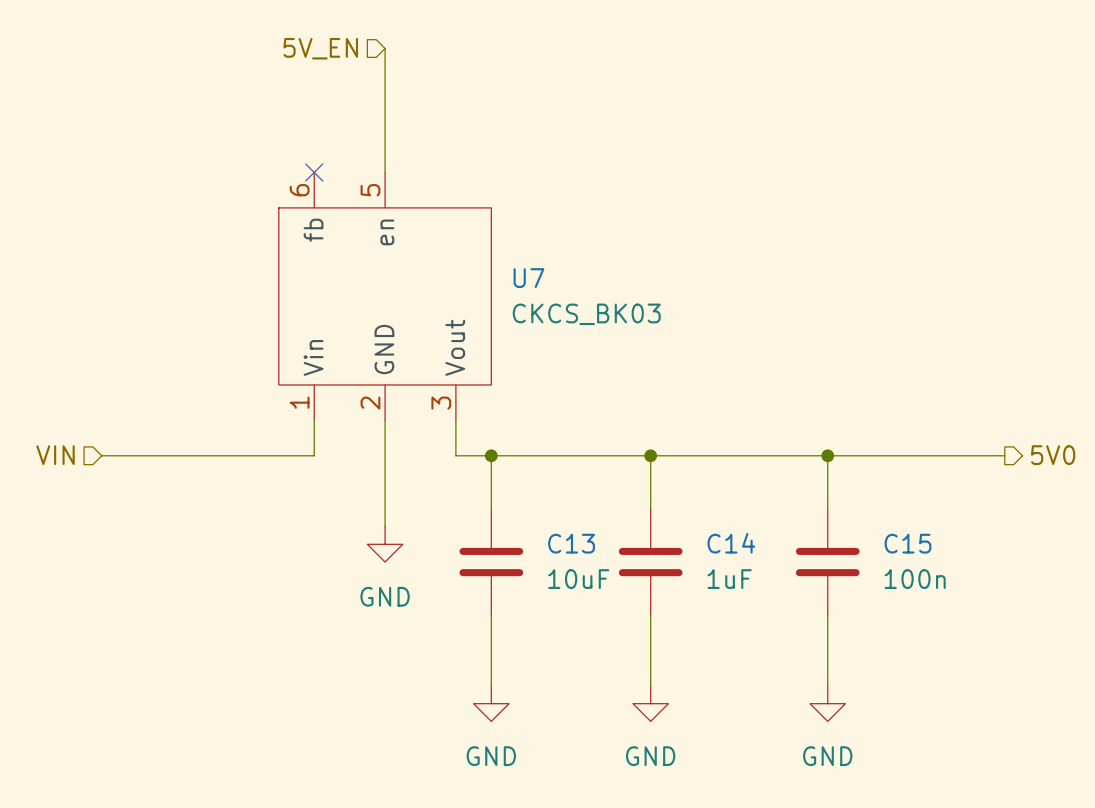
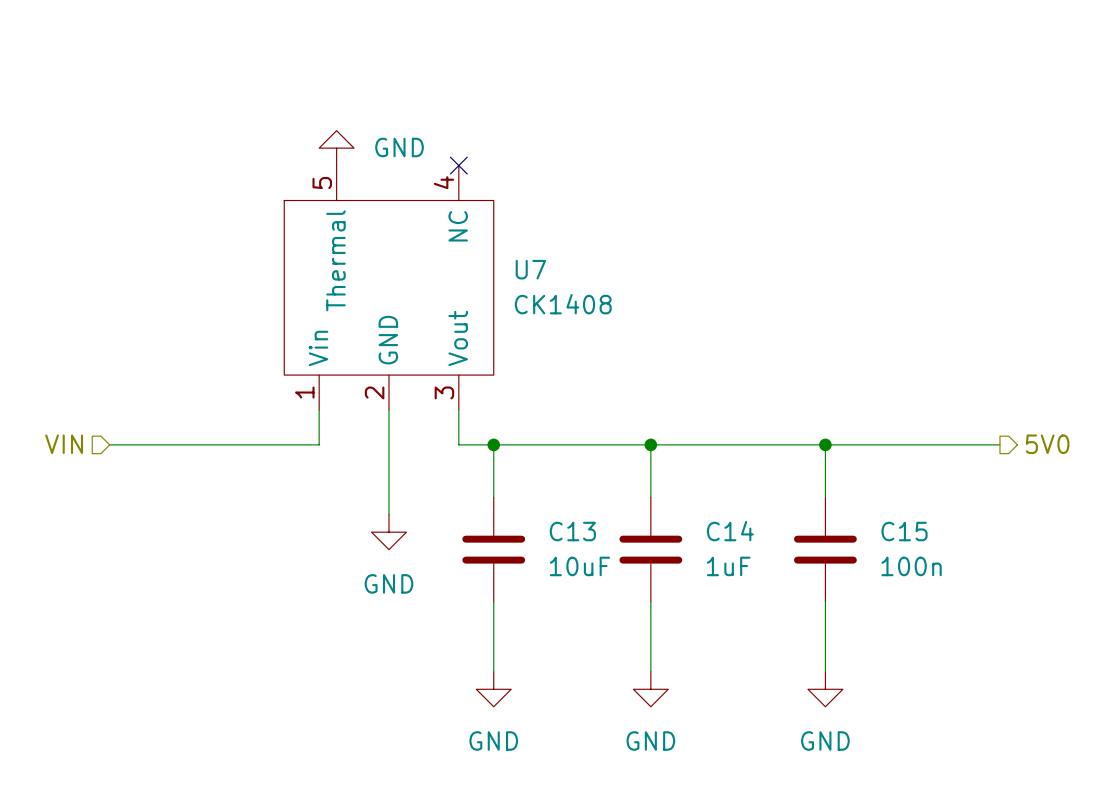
hierarchical label: 5V_EN (320, 48) -> none
wire: (385, 48) (385, 172) -> none
power symbol: none -> GND (336, 148)
U7 symbol: [278, 172, 492, 421] -> [284, 165, 494, 410]
no-connect mark: (314, 172) -> none
no-connect mark: none -> (458, 165)
U7 value: CKCS_BK03 (586, 314) -> CK1408 (563, 304)

